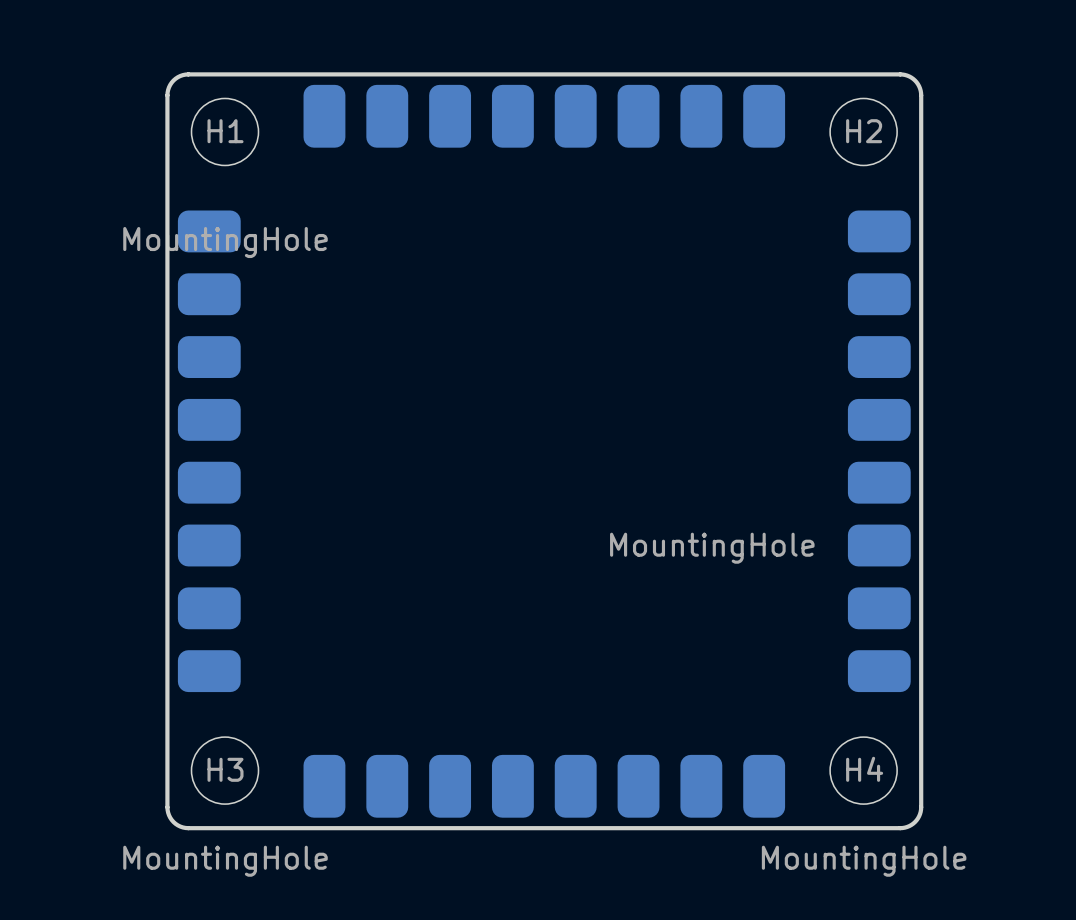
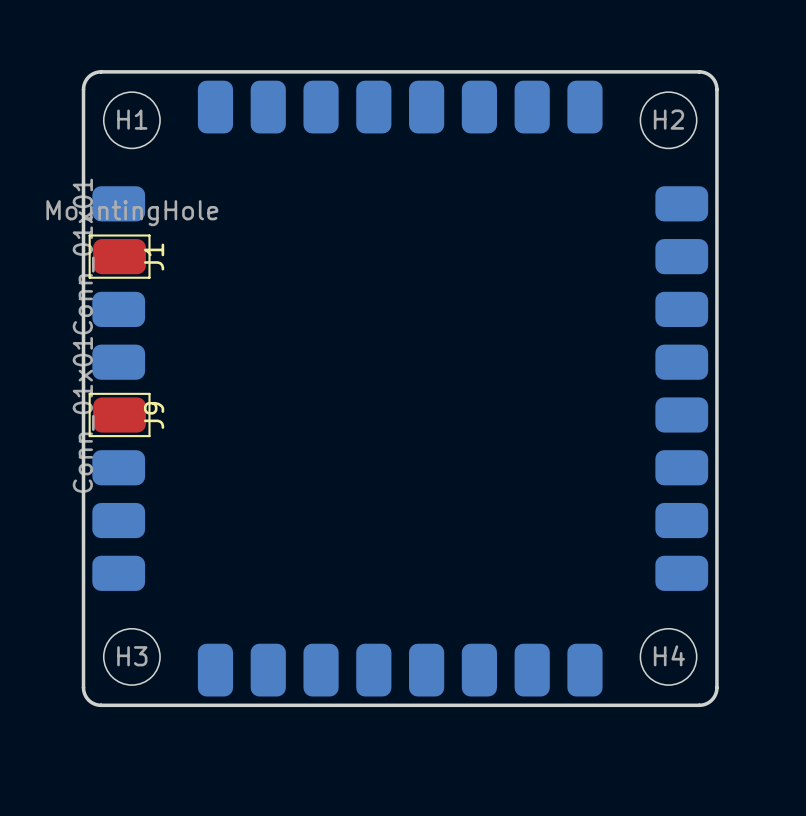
J1 side: bottom (209, 294) -> top (119, 256)
J9 side: bottom (209, 482) -> top (119, 414)
H2 value: MountingHole (712, 548) -> none
H3 value: MountingHole (225, 861) -> none
H4 value: MountingHole (864, 861) -> none

